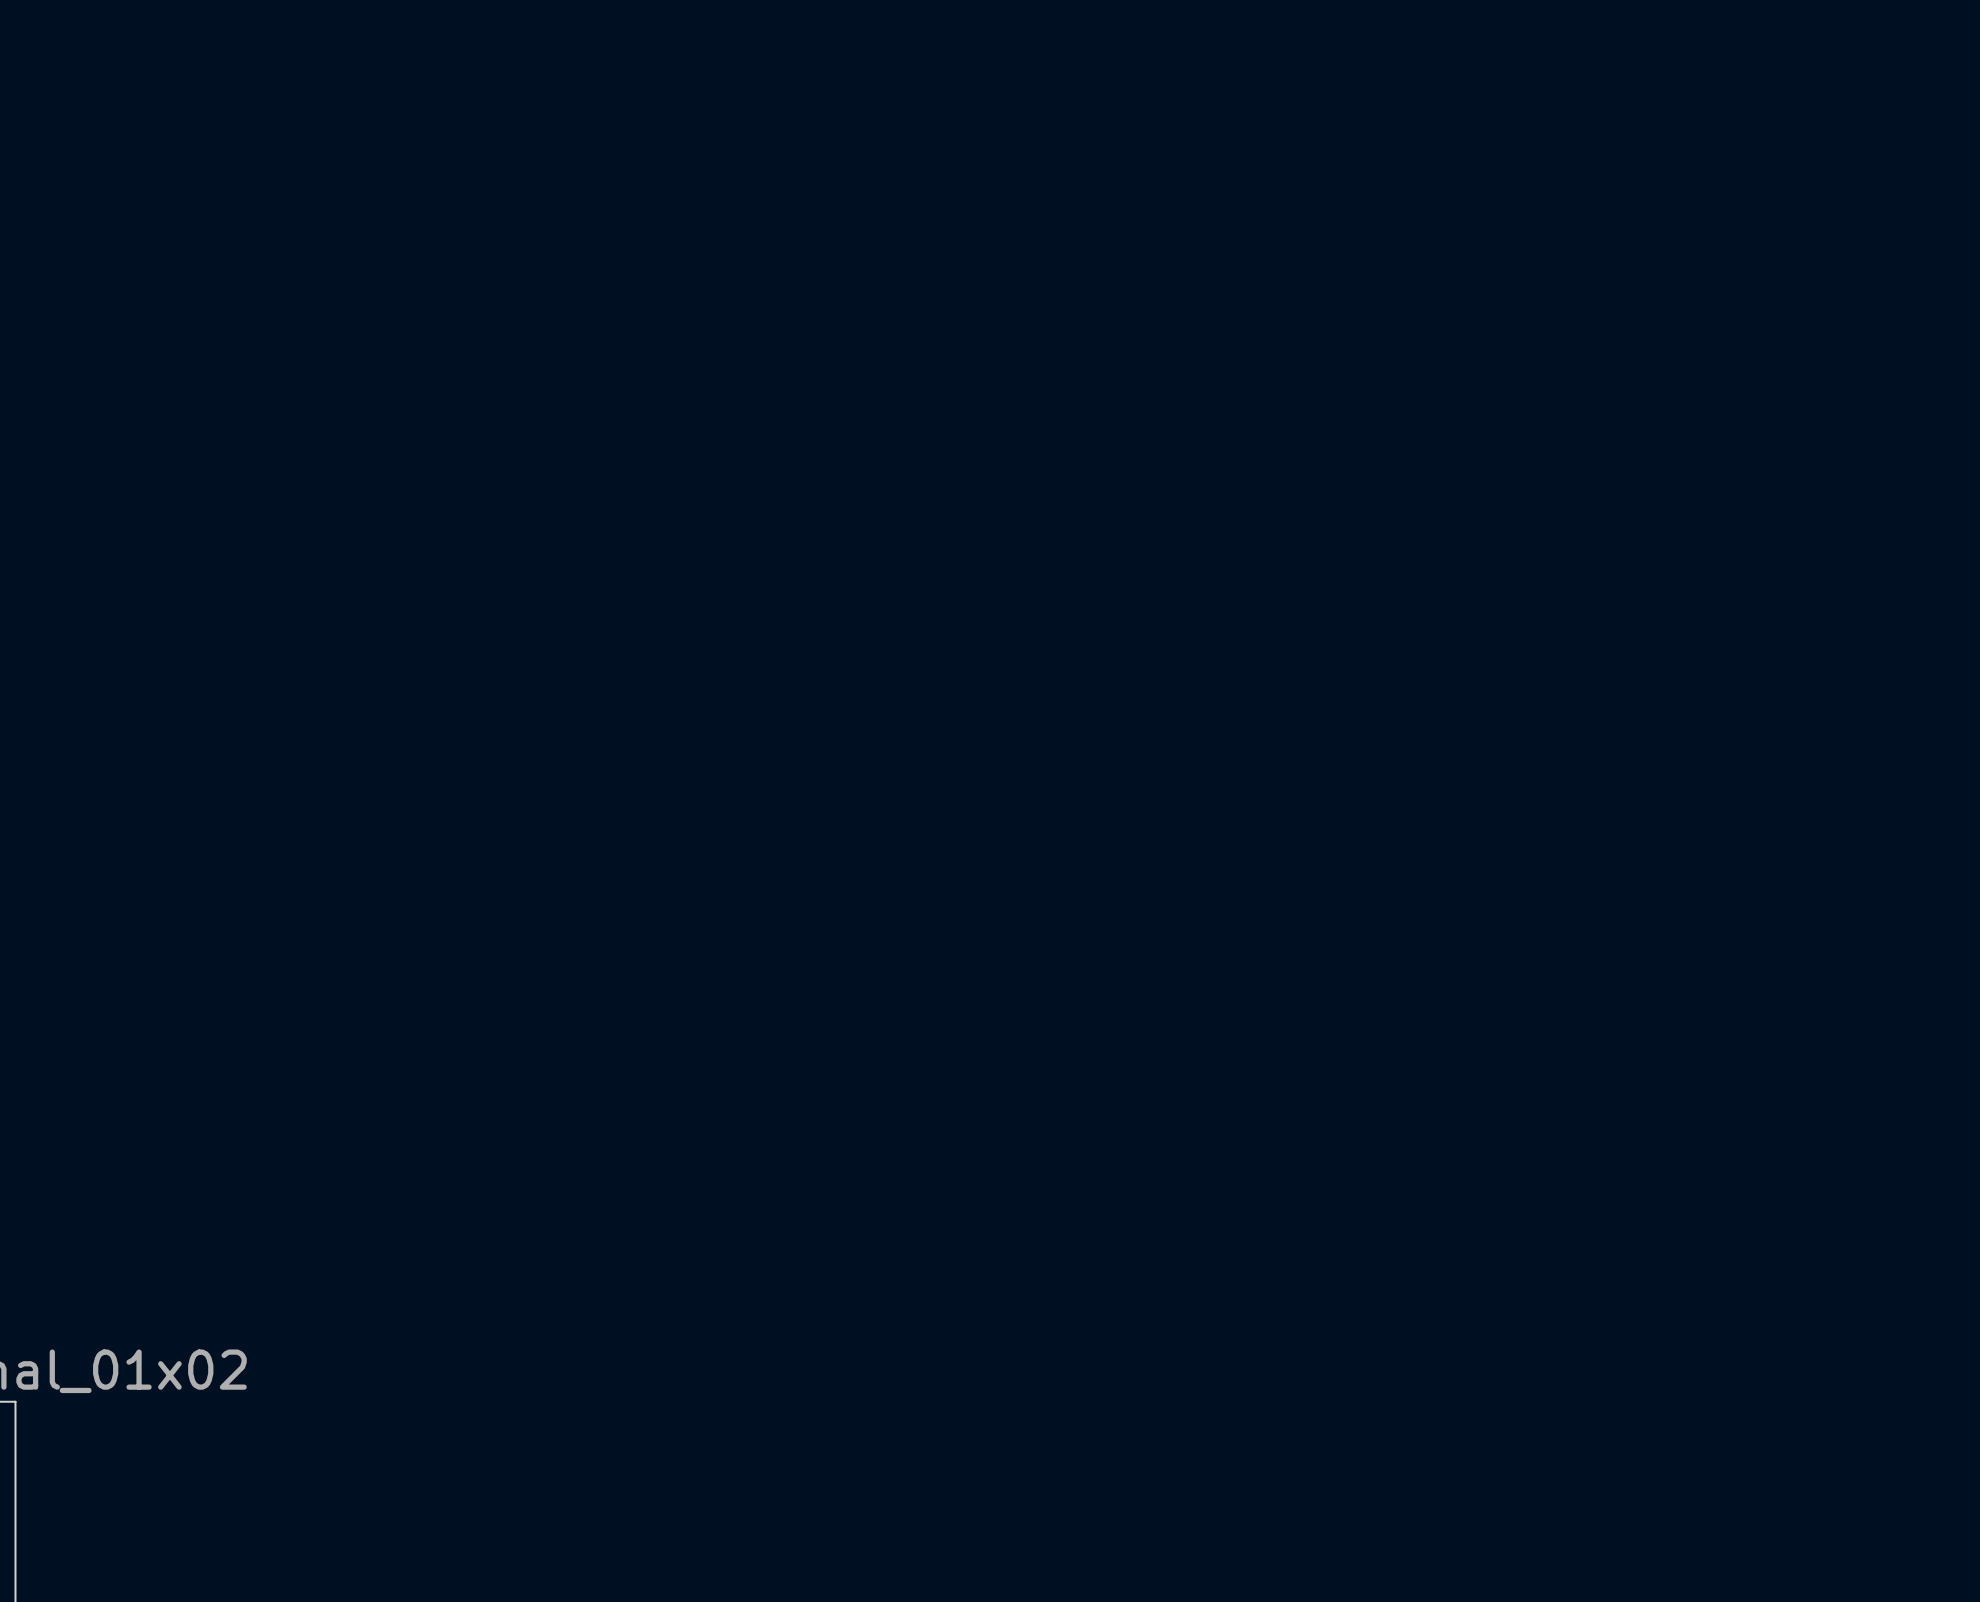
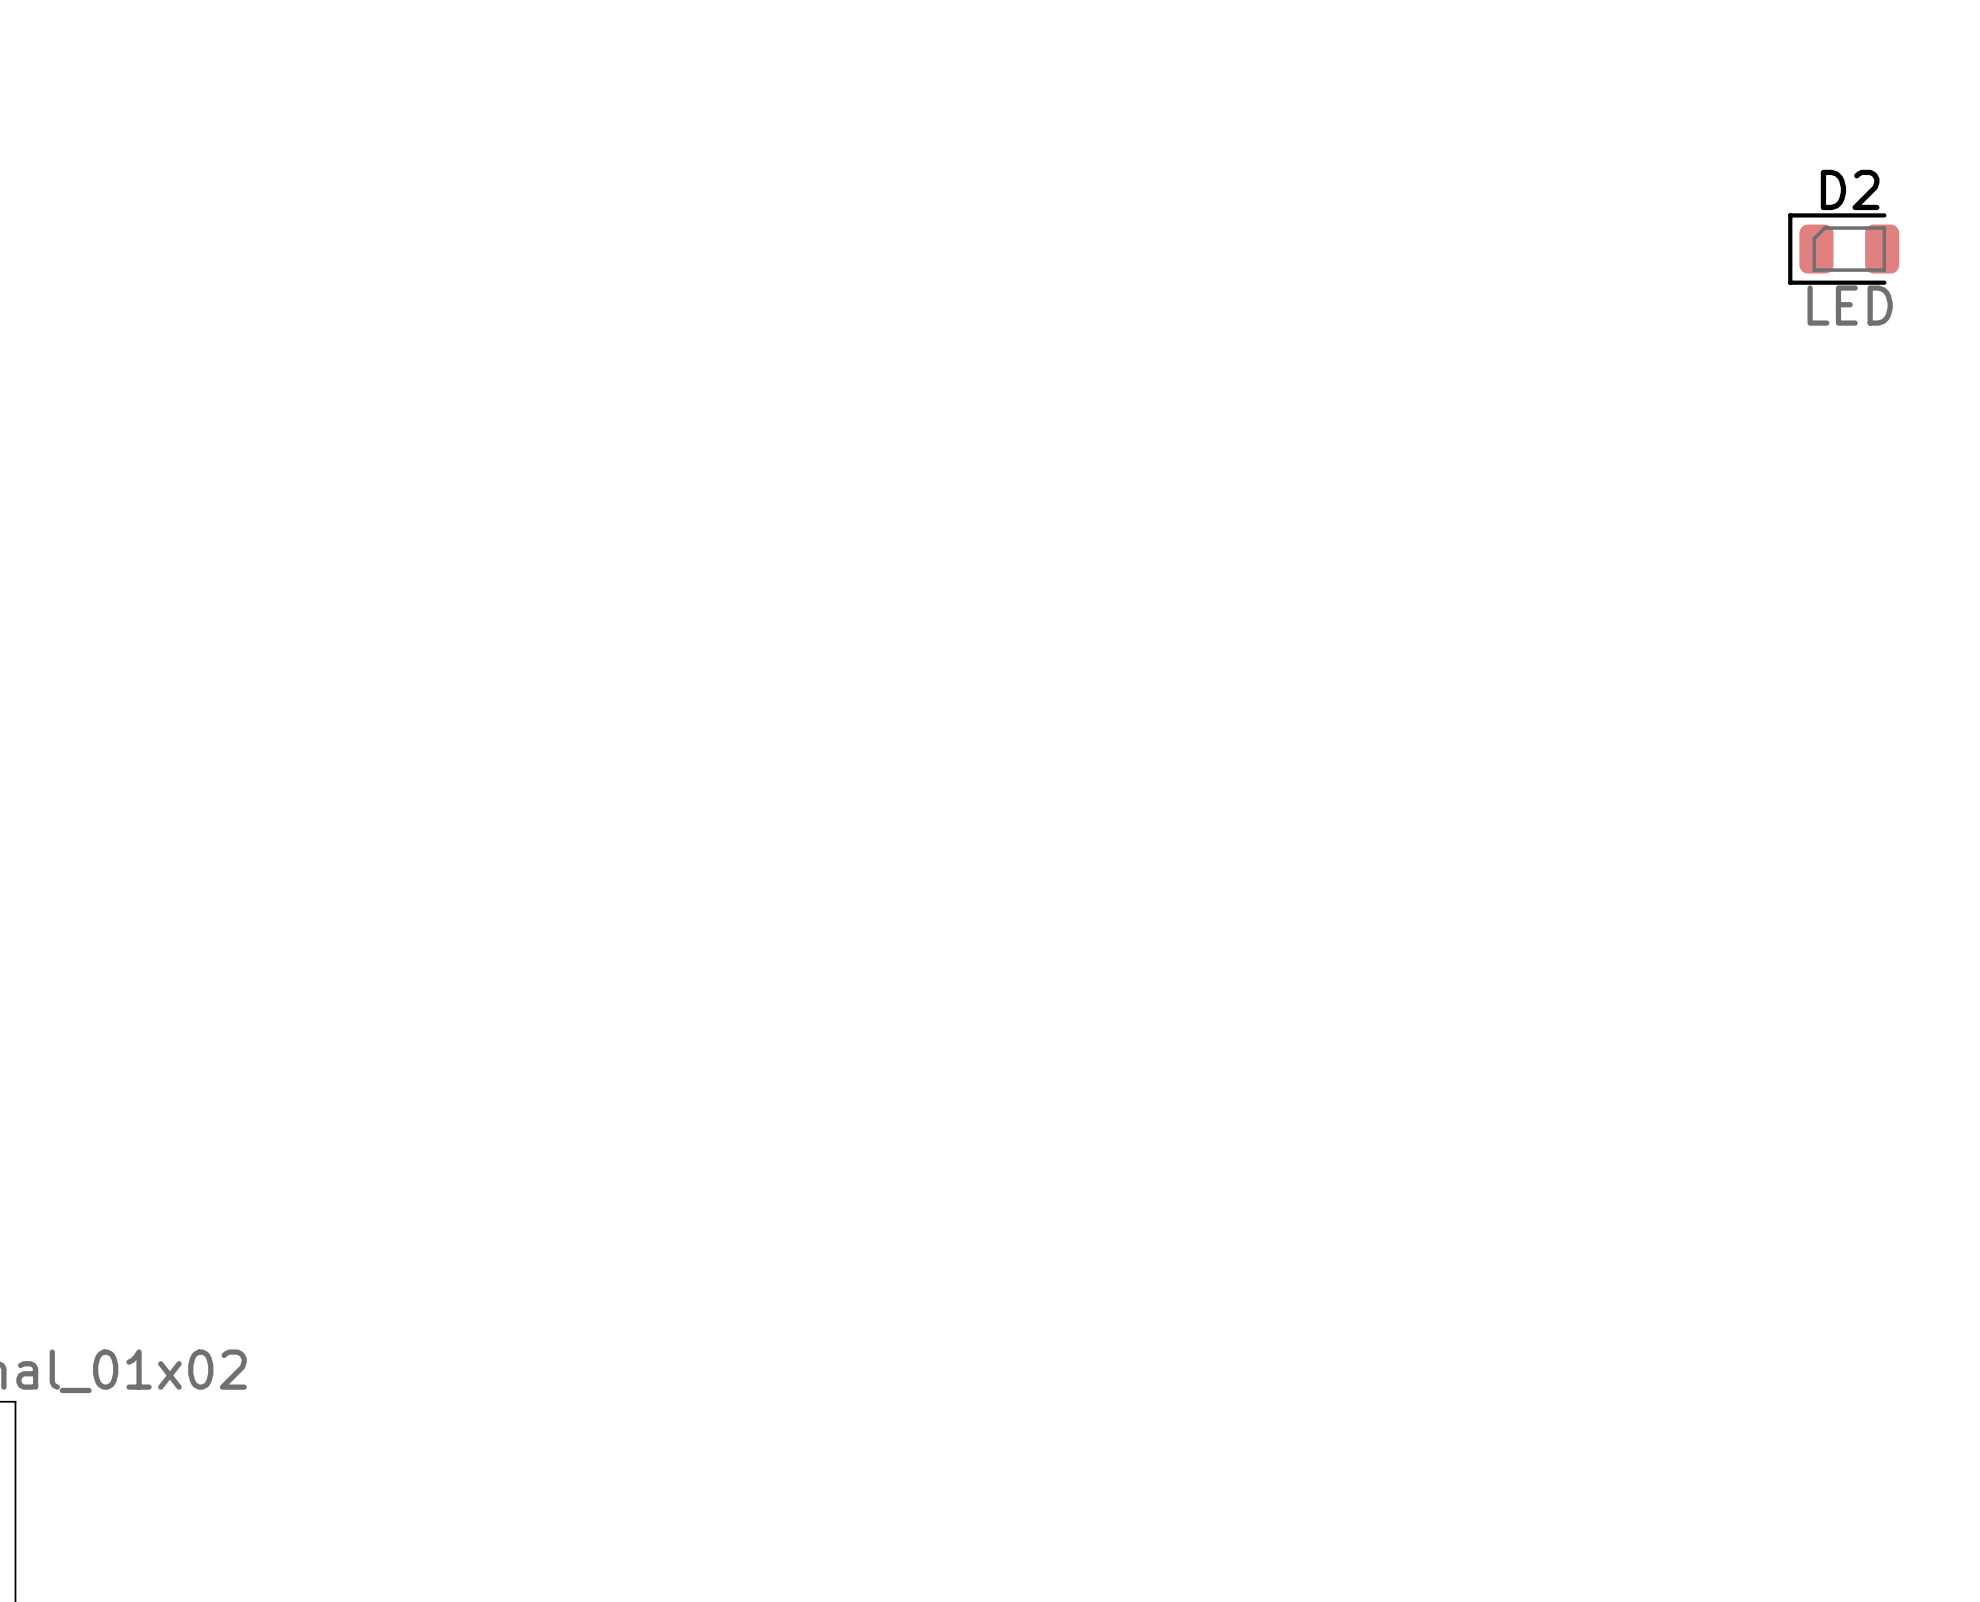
D2: none -> LED (1843, 249)

